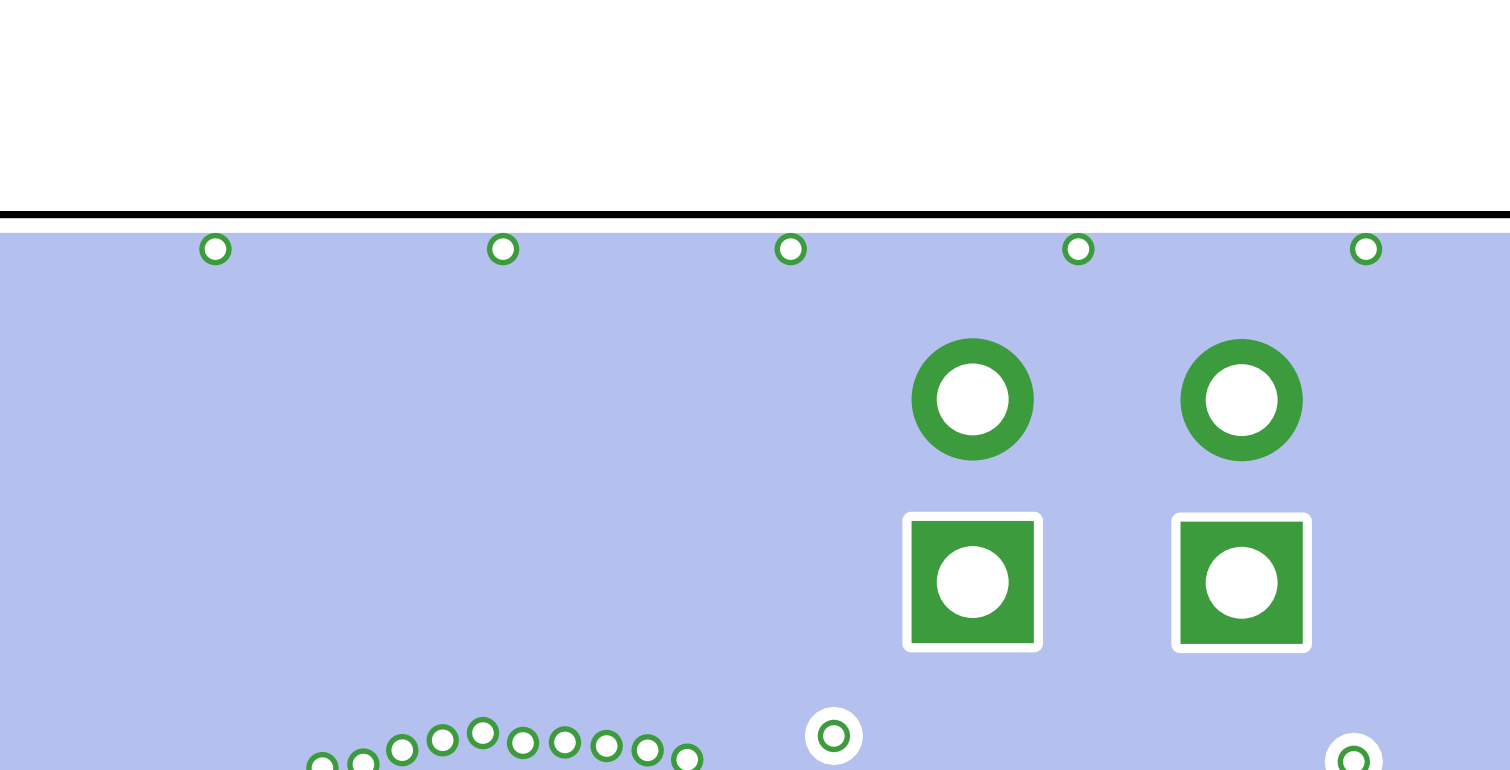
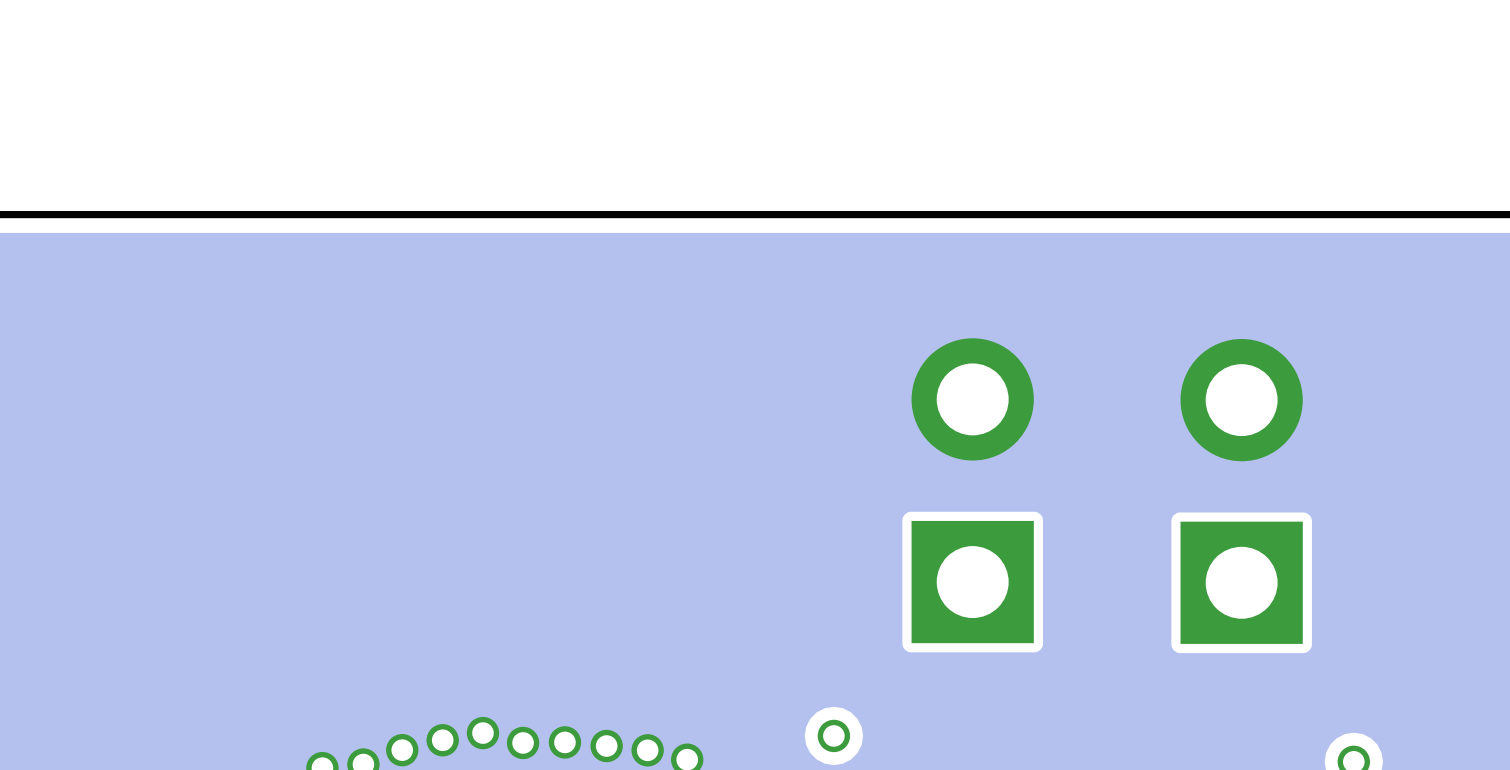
via: (215, 249) -> none
via: (503, 249) -> none
via: (790, 249) -> none
via: (1078, 249) -> none
via: (1366, 249) -> none

